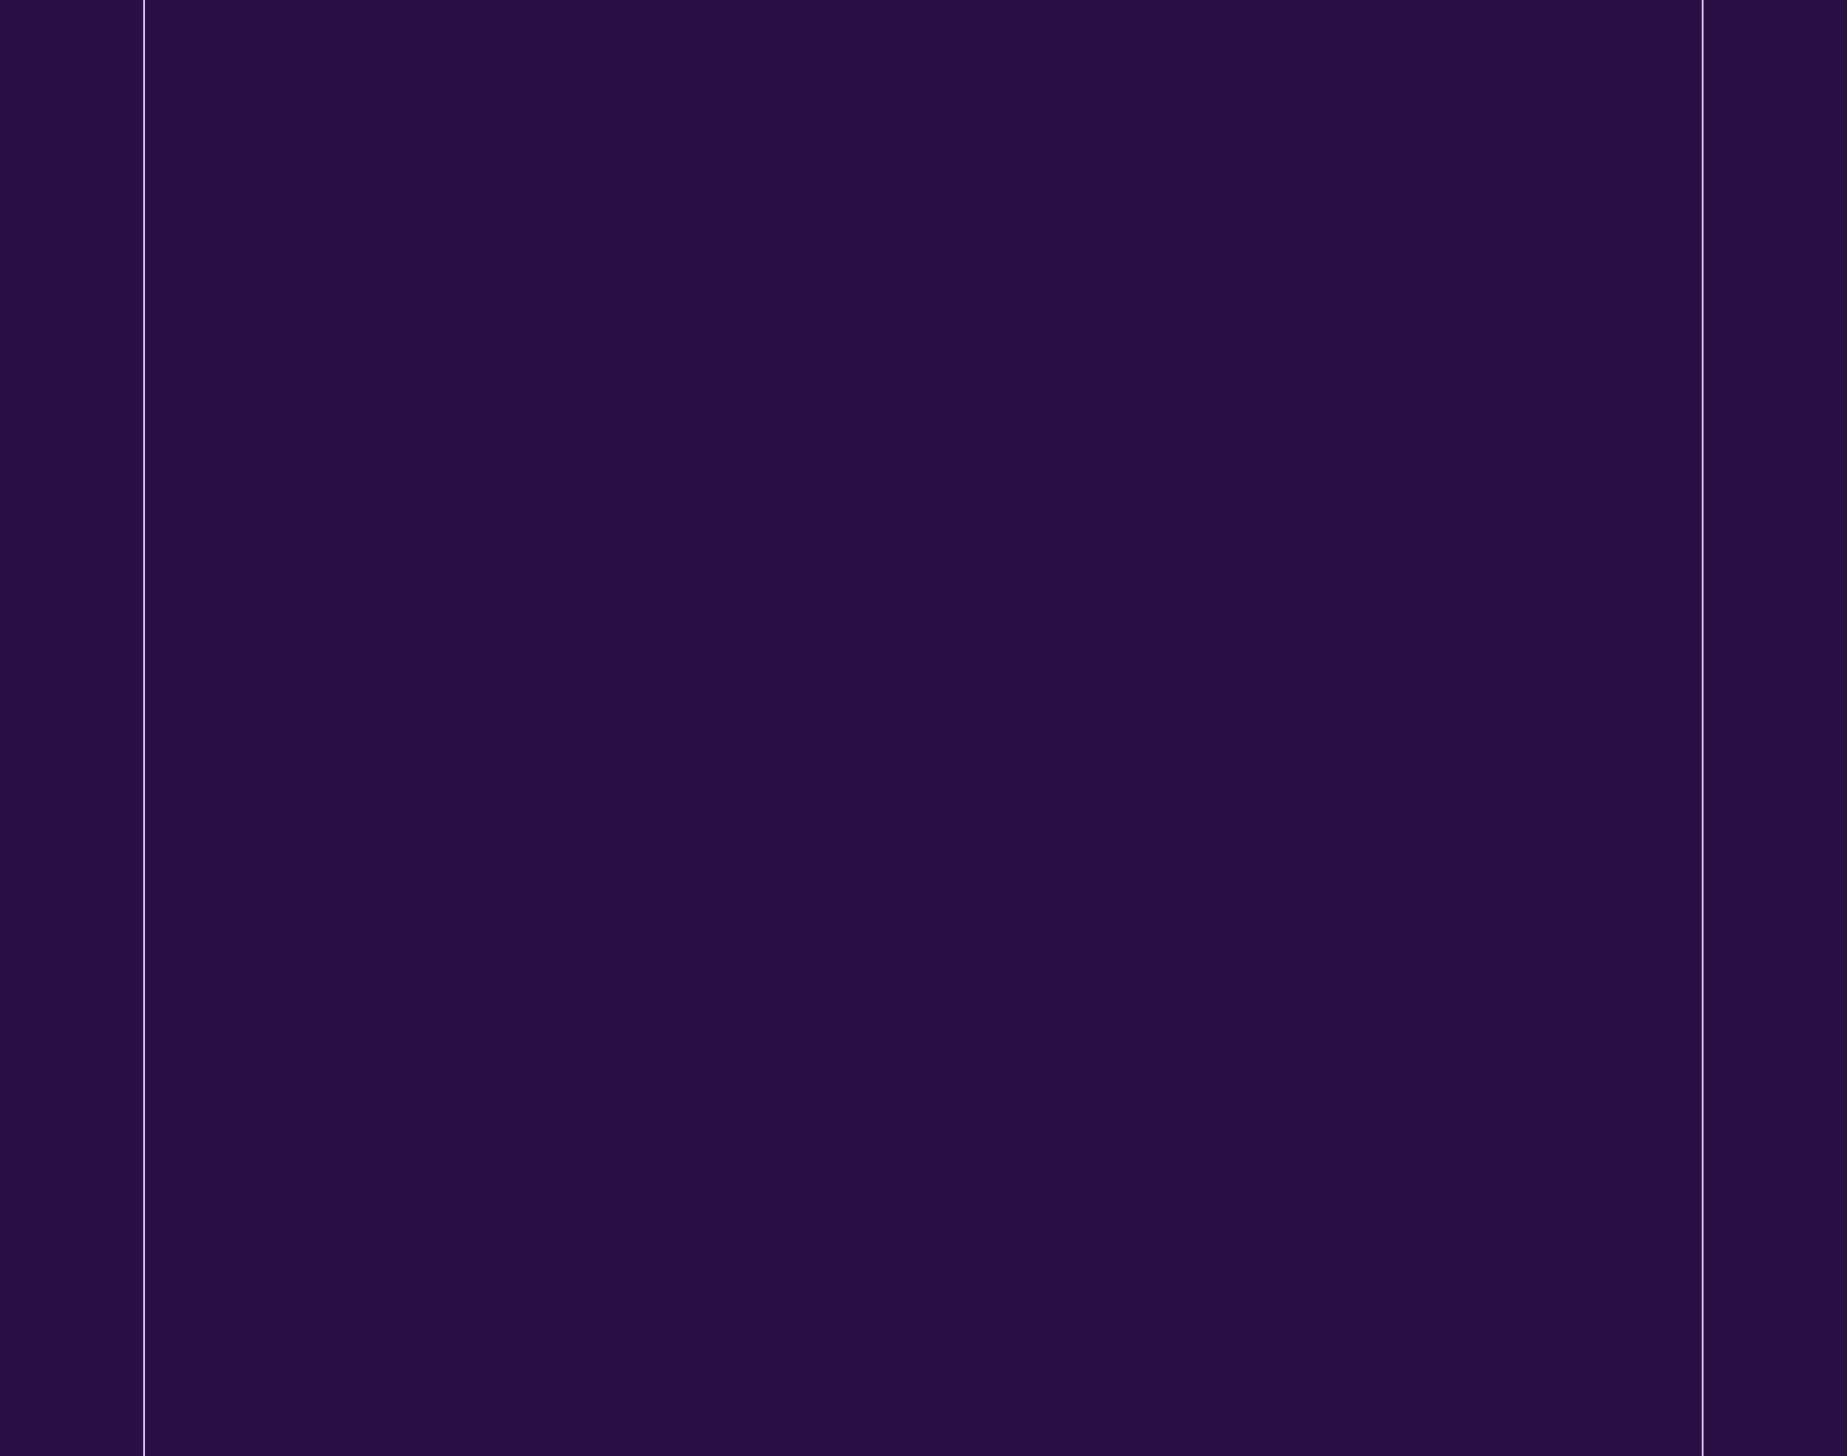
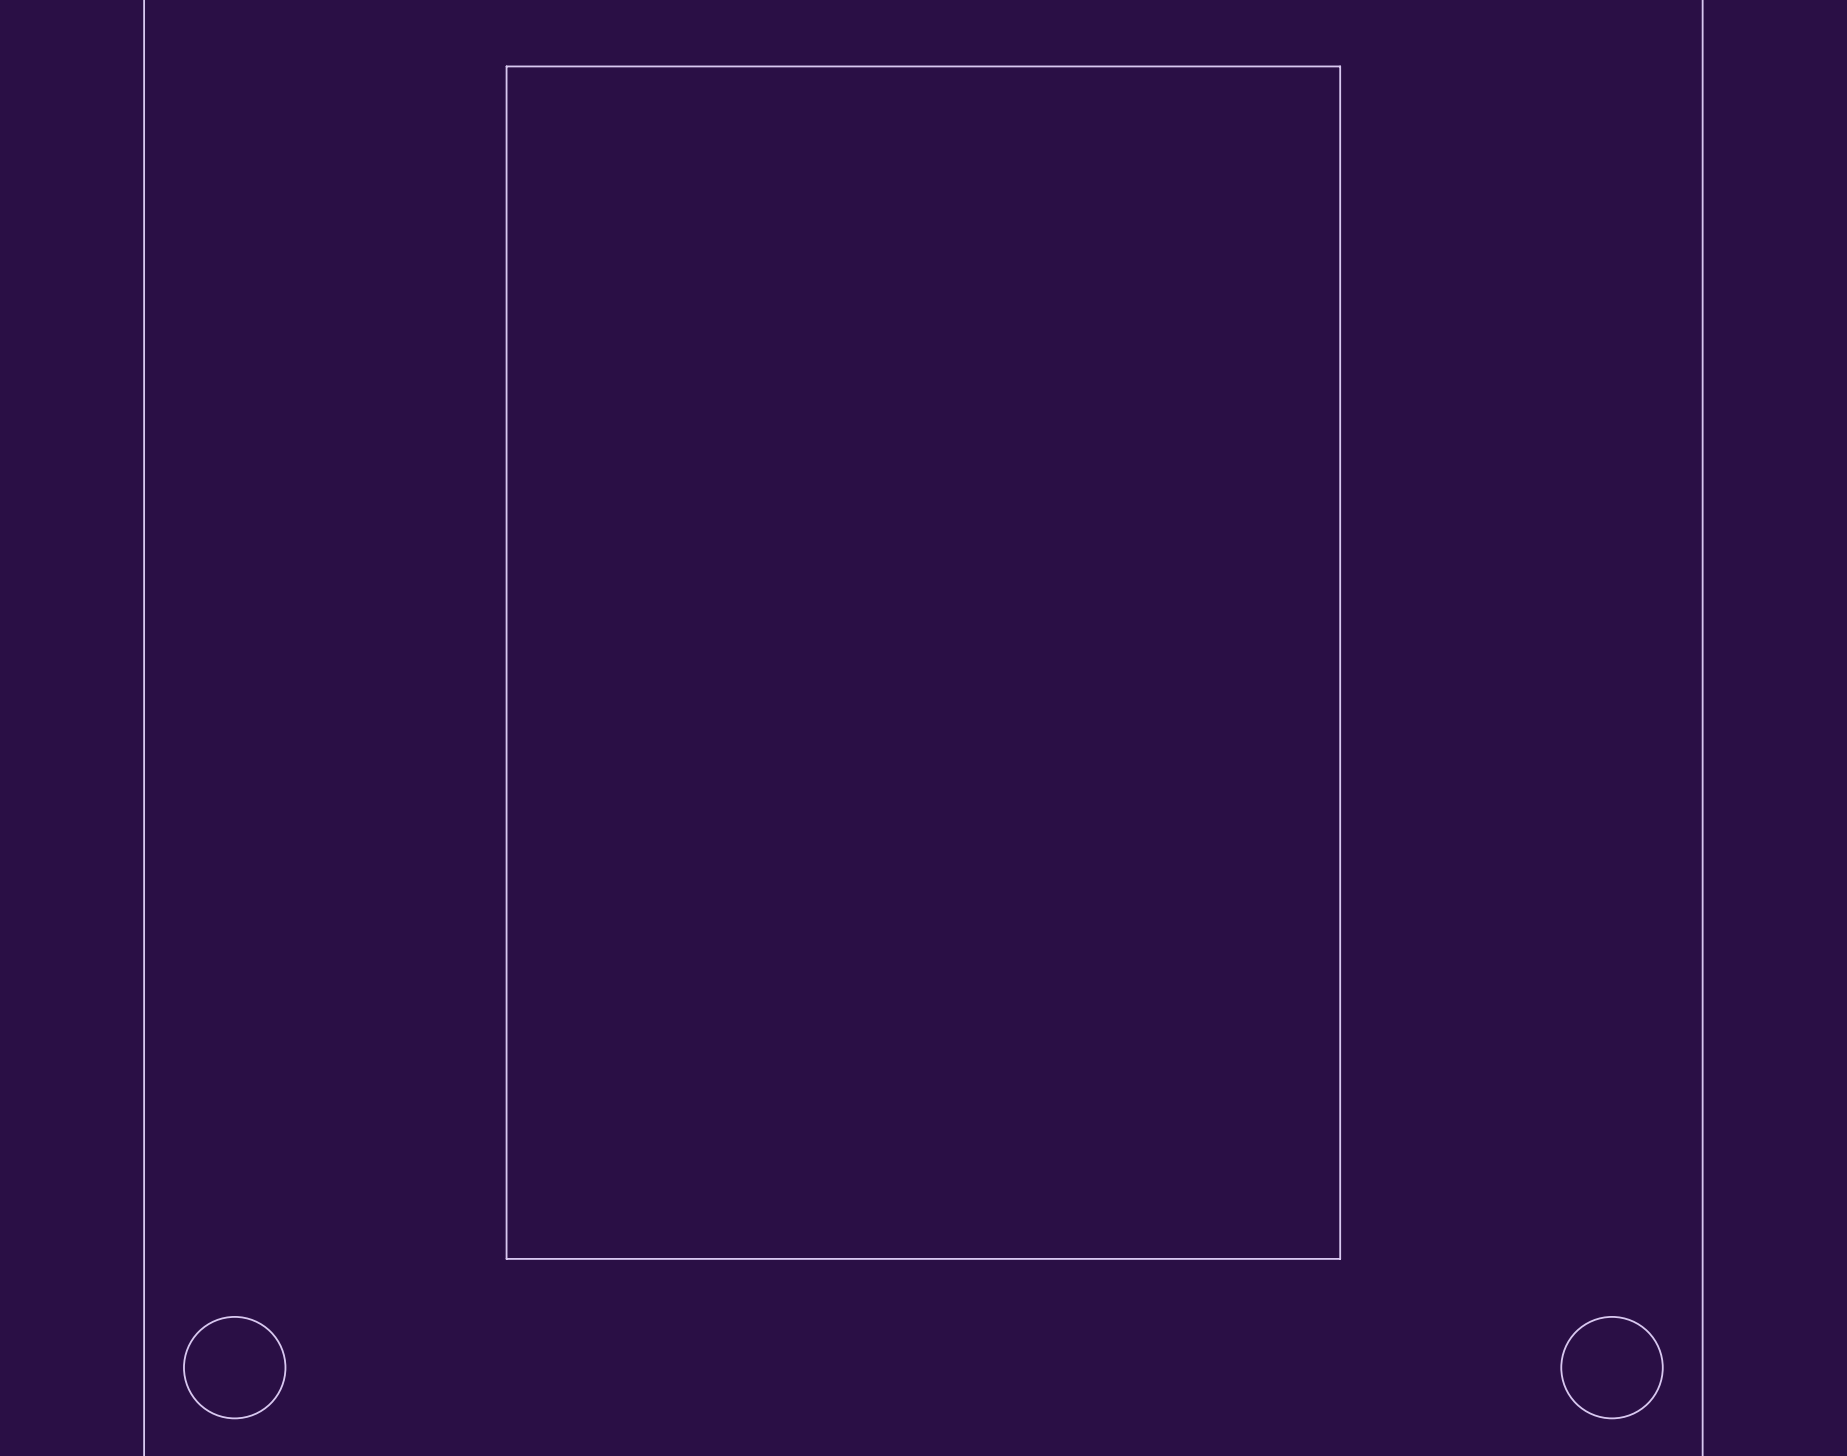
board edge: none -> (1340, 66) (506, 66) (506, 1258) (1340, 1258) (1340, 66)
round board edge: none -> [183, 1315, 287, 1420]
round board edge: none -> [1560, 1315, 1664, 1420]

